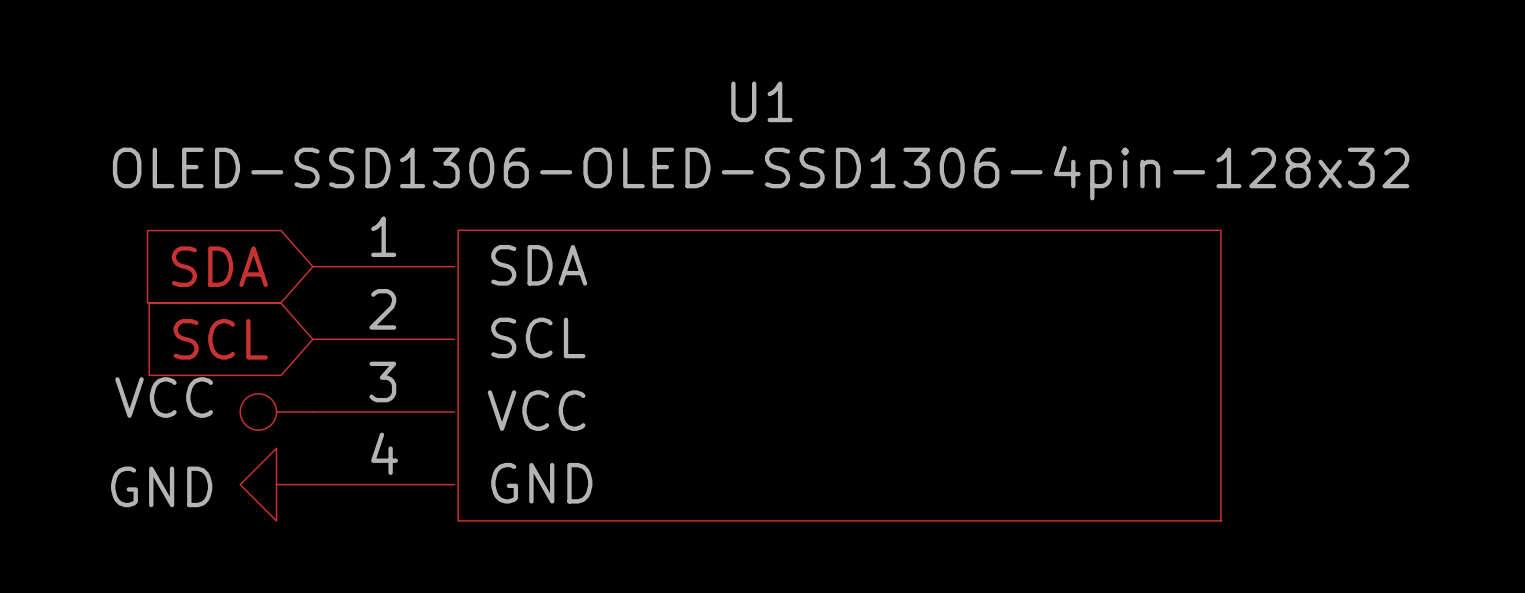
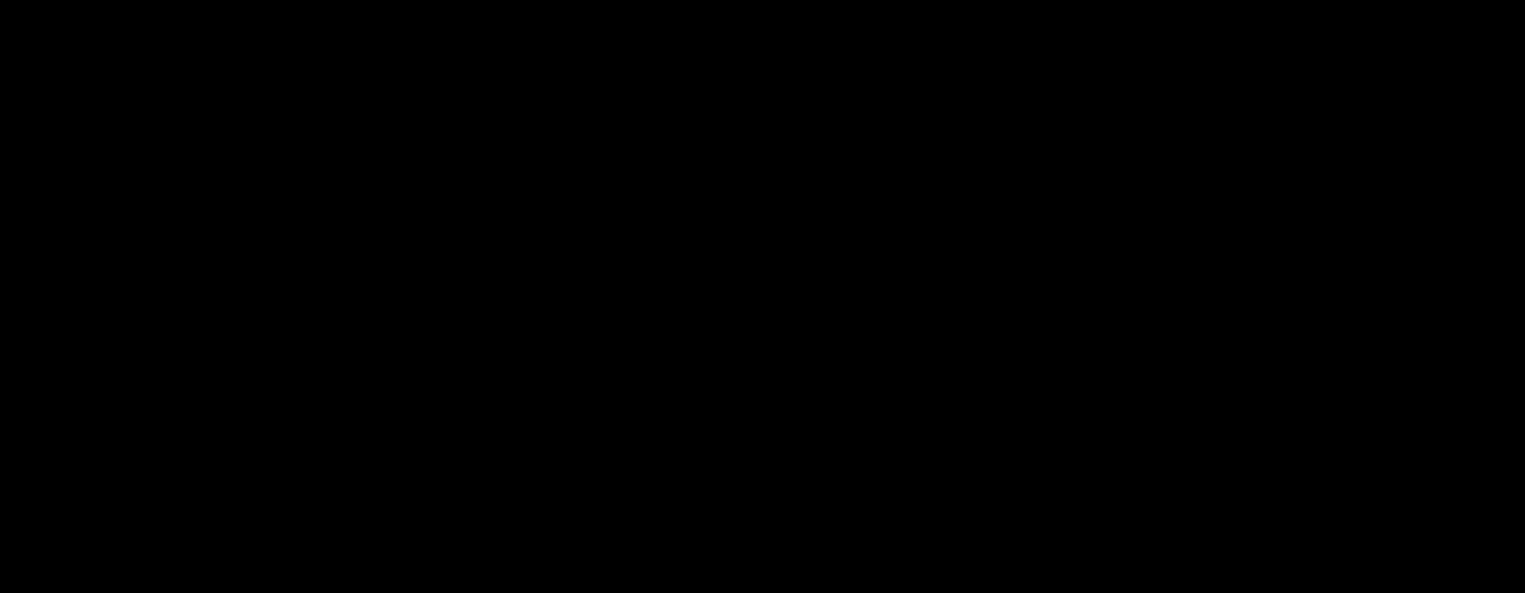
global label: SDA (219, 266) -> none
global label: SCL (220, 339) -> none
U1: OLED-SSD1306-OLED-SSD1306-4pin-128x32 (766, 375) -> none
power symbol: VCC (276, 411) -> none
power symbol: GND (276, 484) -> none

